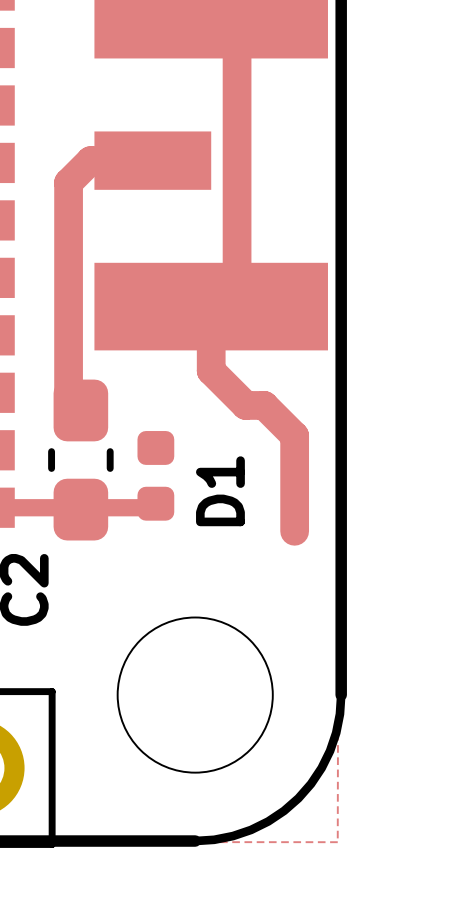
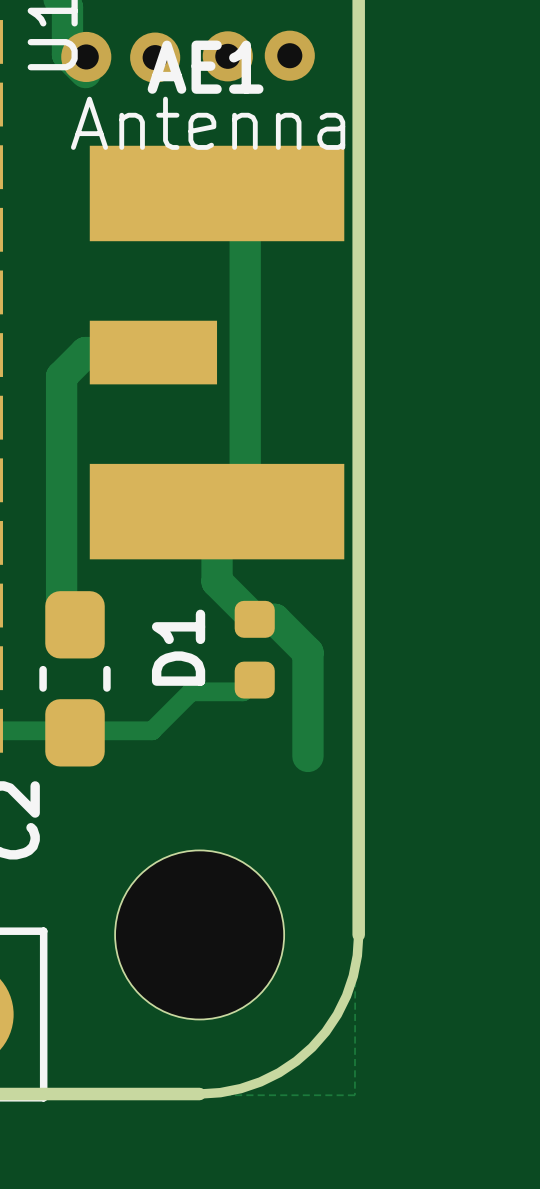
track: none -> (254, 680) (242, 691) (191, 691) (152, 730)
D1 position: (155, 475) -> (254, 649)
D1 name position: D1 (220, 491) -> D1 (178, 647)

